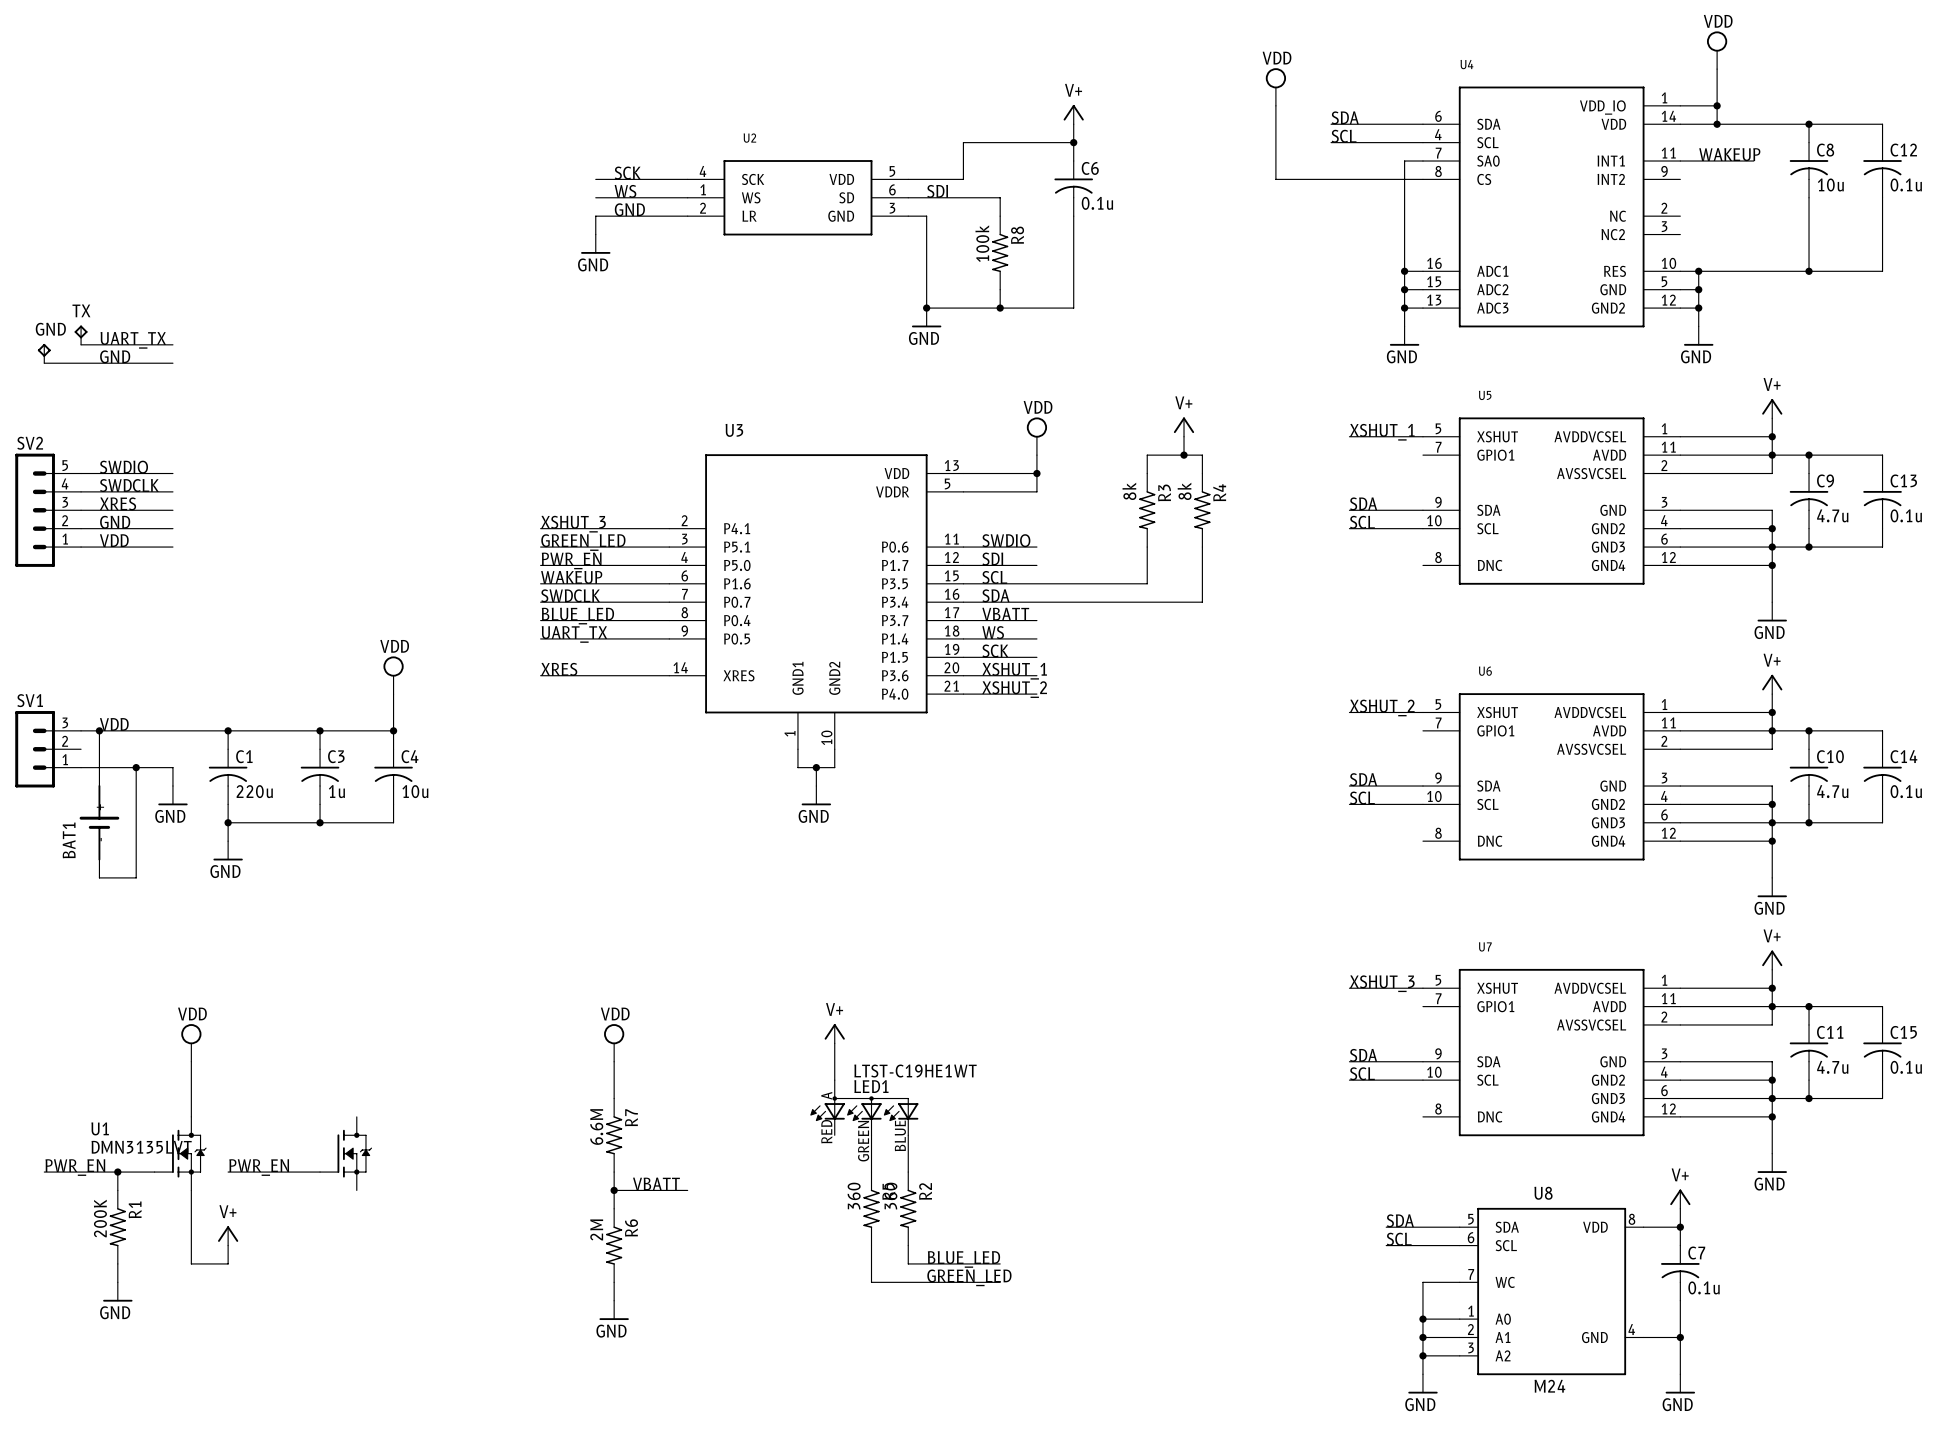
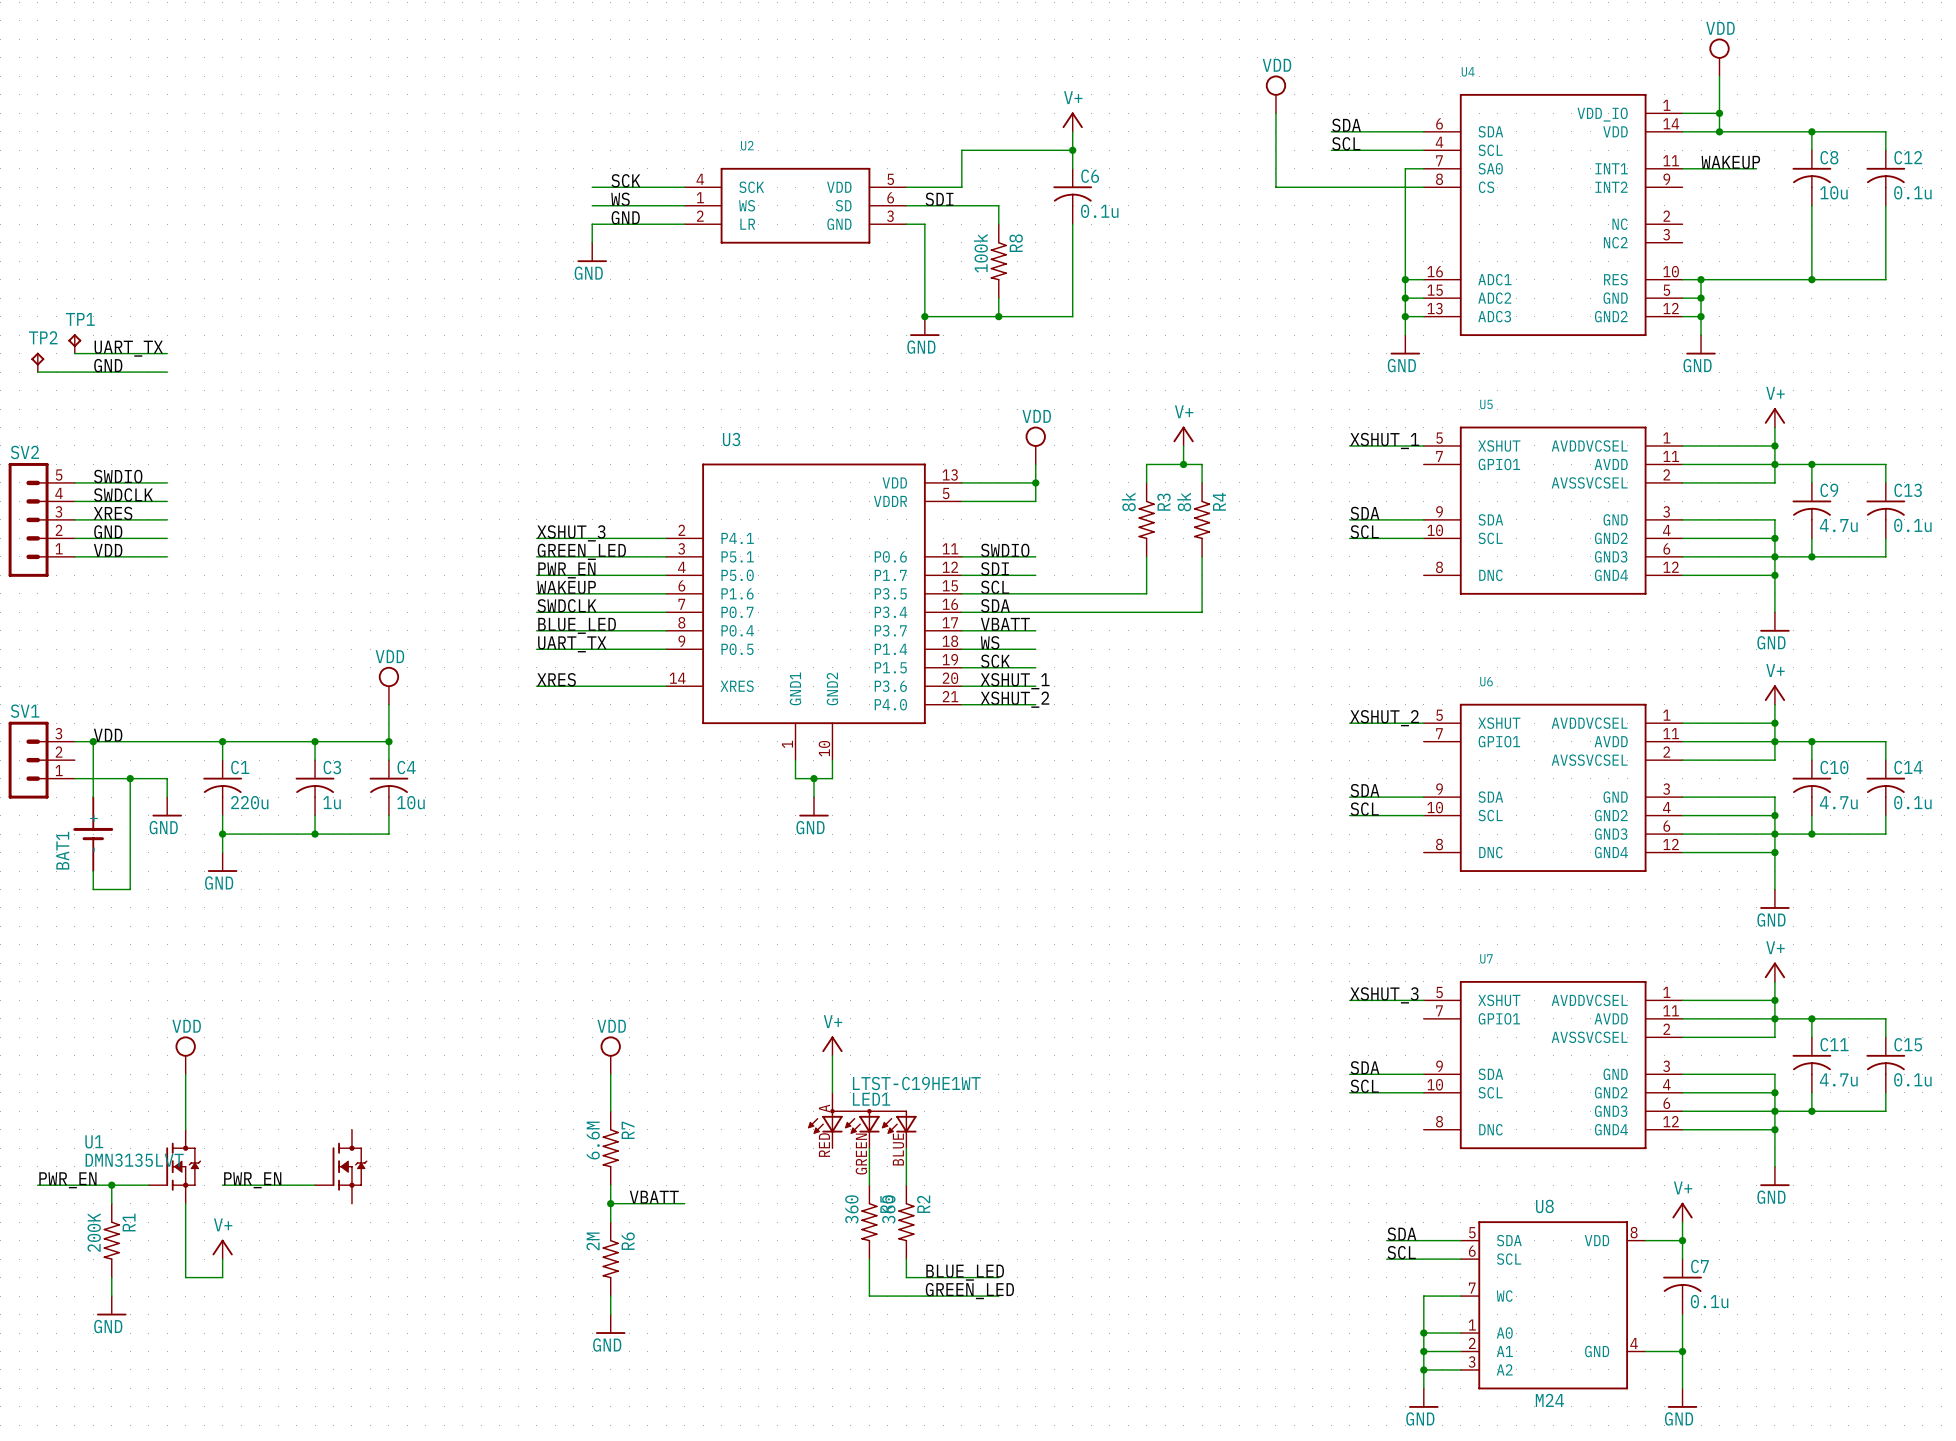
TX name: TX (81, 310) -> TP1 (80, 319)
GND name: GND (50, 329) -> TP2 (43, 337)

